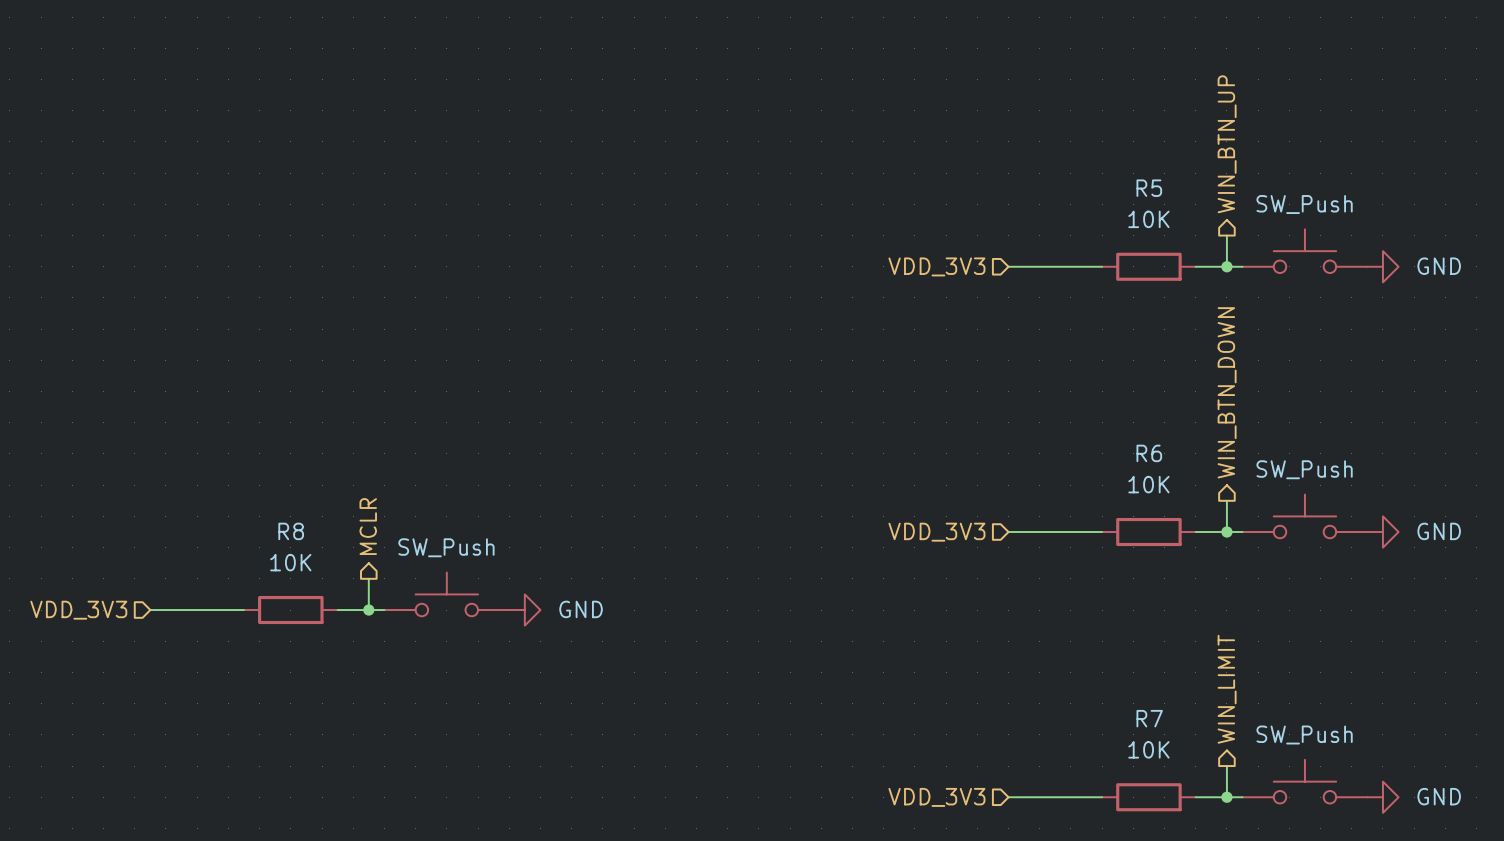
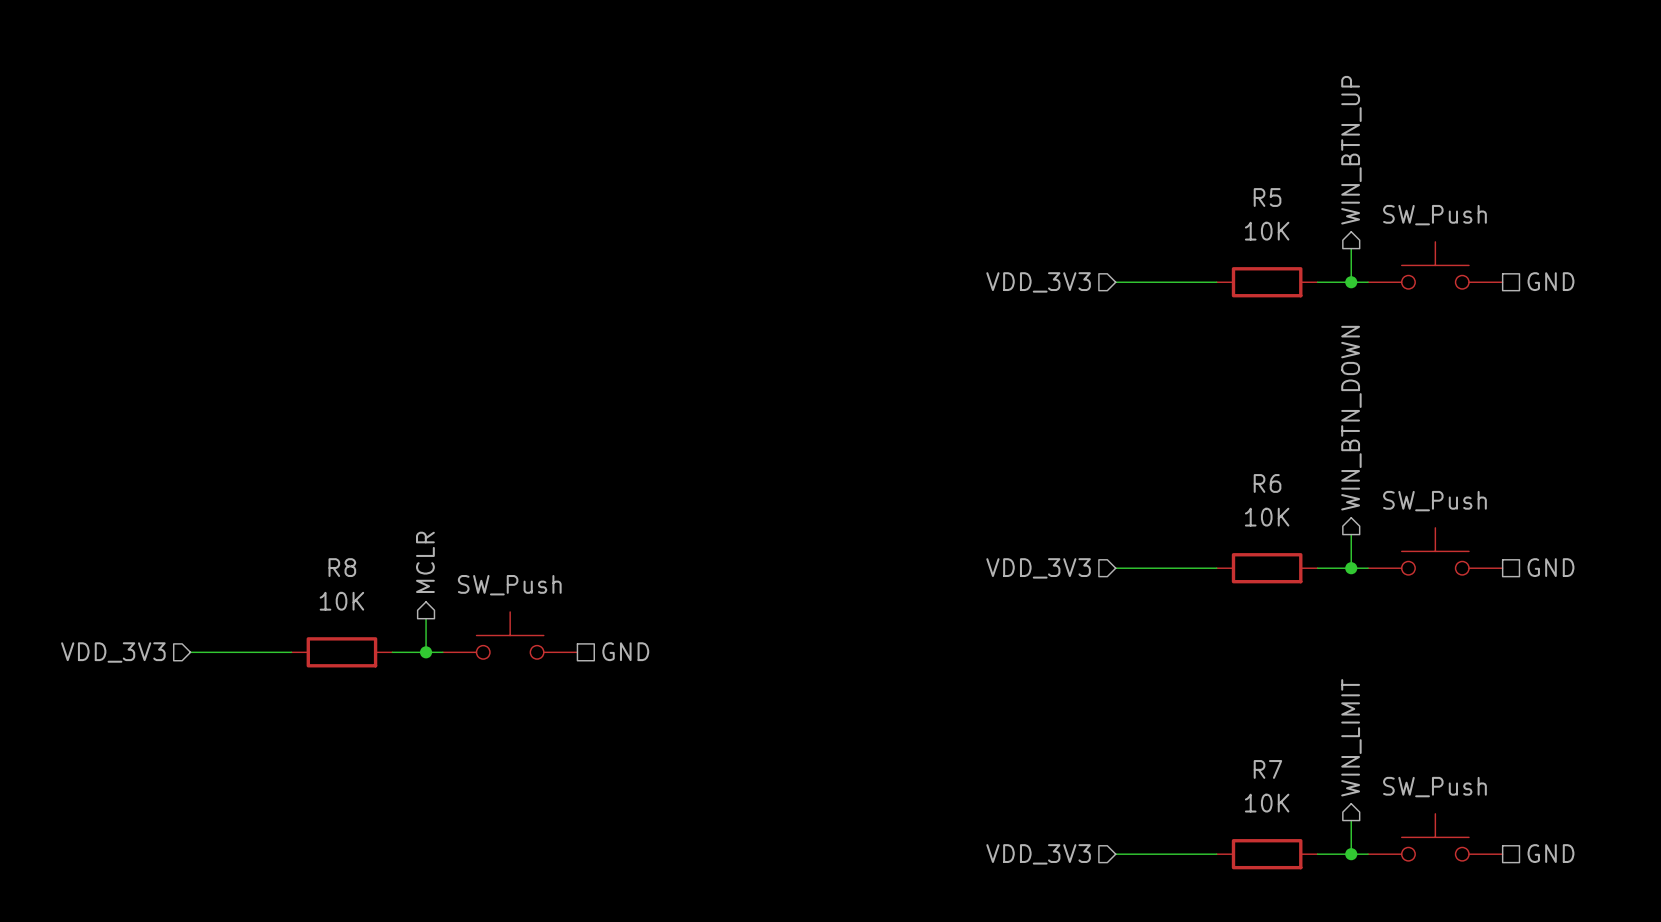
power symbol: GND (1382, 266) -> none
hierarchical label: none -> GND (1550, 281)
hierarchical label: none -> GND (1550, 567)
power symbol: GND (1382, 532) -> none
hierarchical label: none -> GND (625, 651)
power symbol: GND (524, 610) -> none
hierarchical label: none -> GND (1550, 853)
power symbol: GND (1382, 797) -> none

